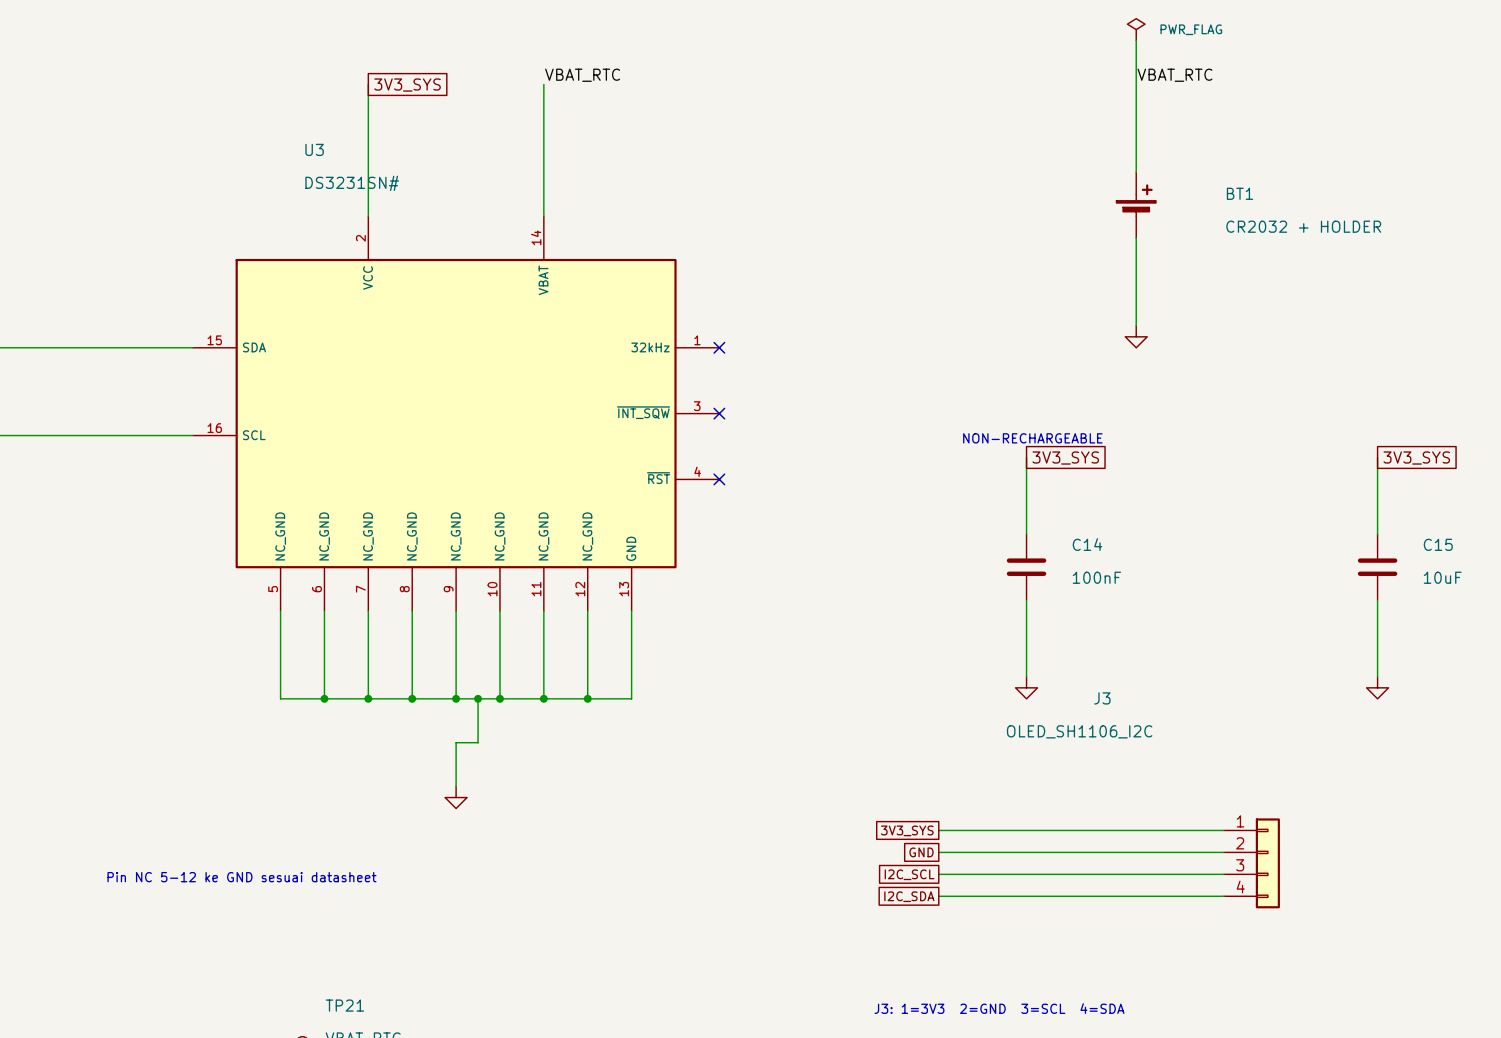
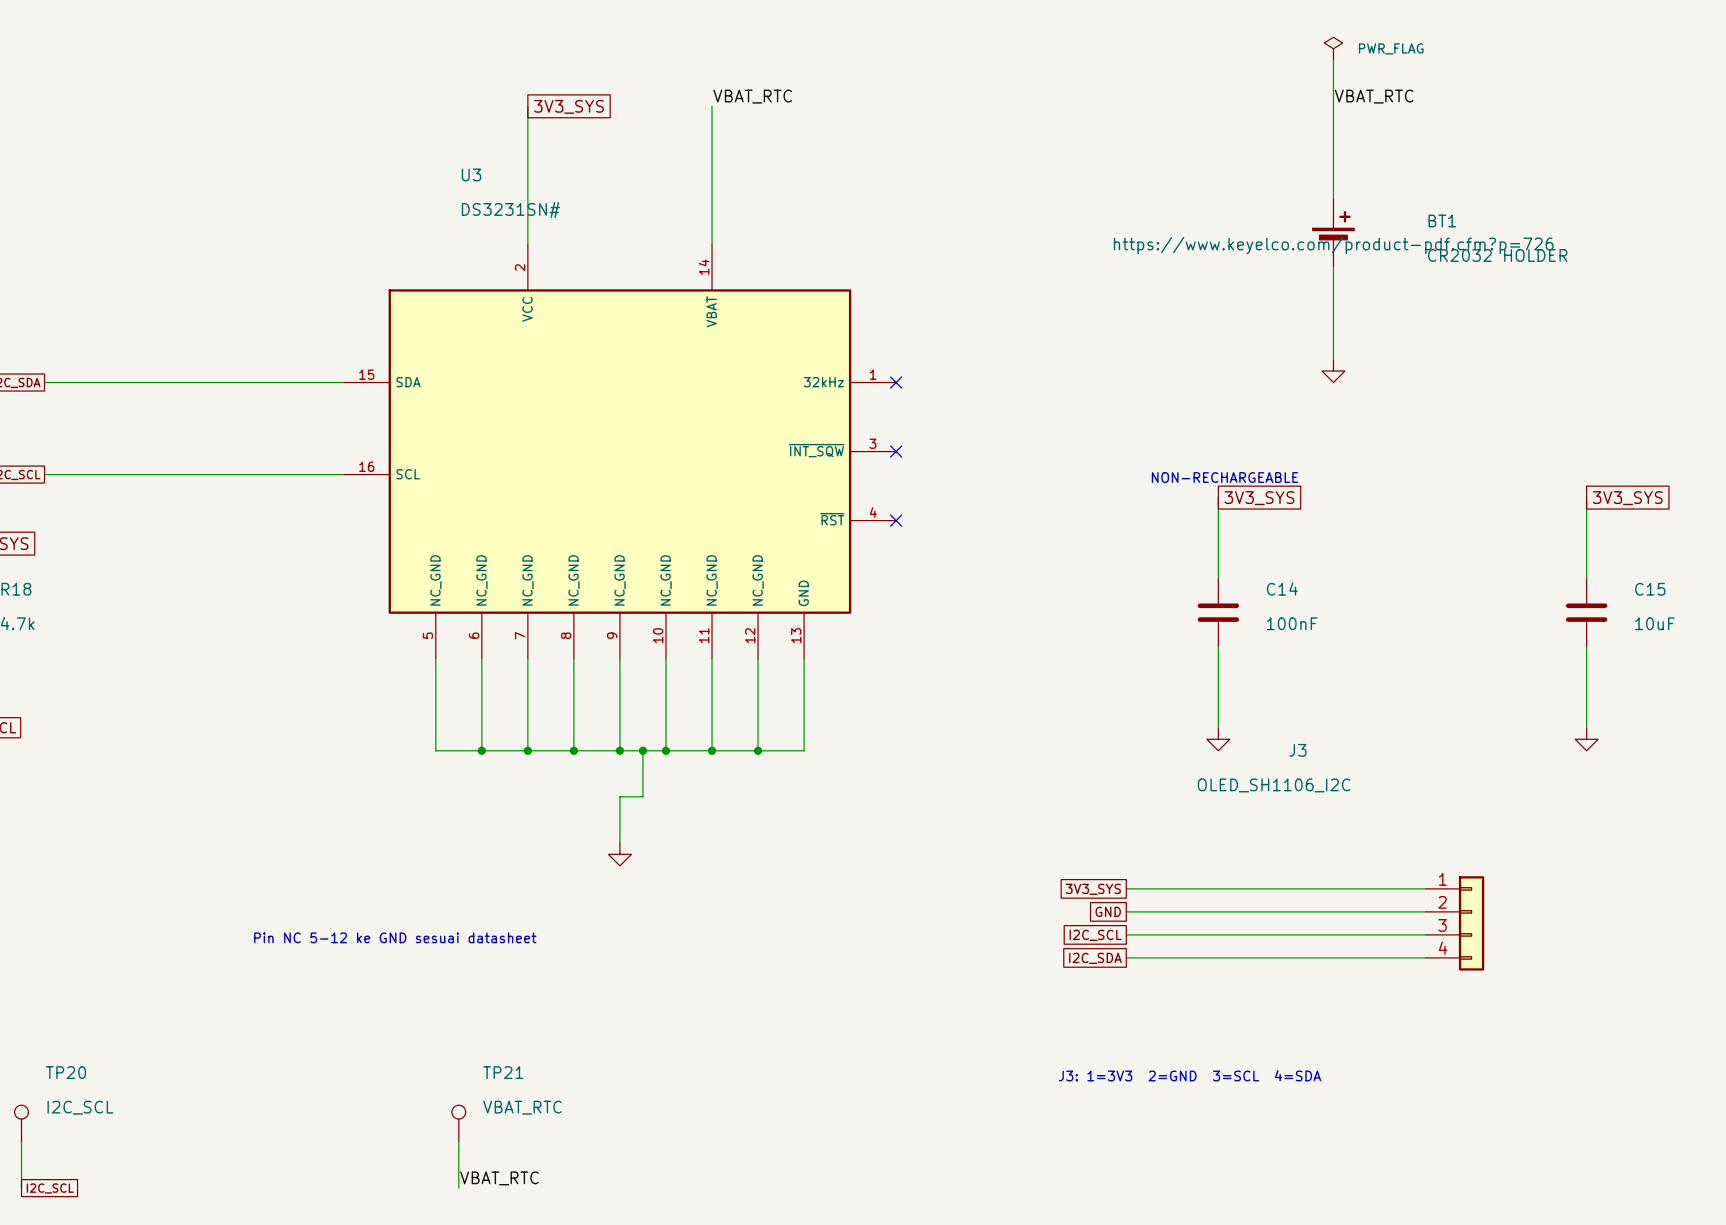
BT1 text: none -> https://www.keyelco.com/product-pdf.cfm?p=726 (1333, 245)
BT1 value: CR2032 + HOLDER (1303, 226) -> CR2032 HOLDER (1497, 255)

